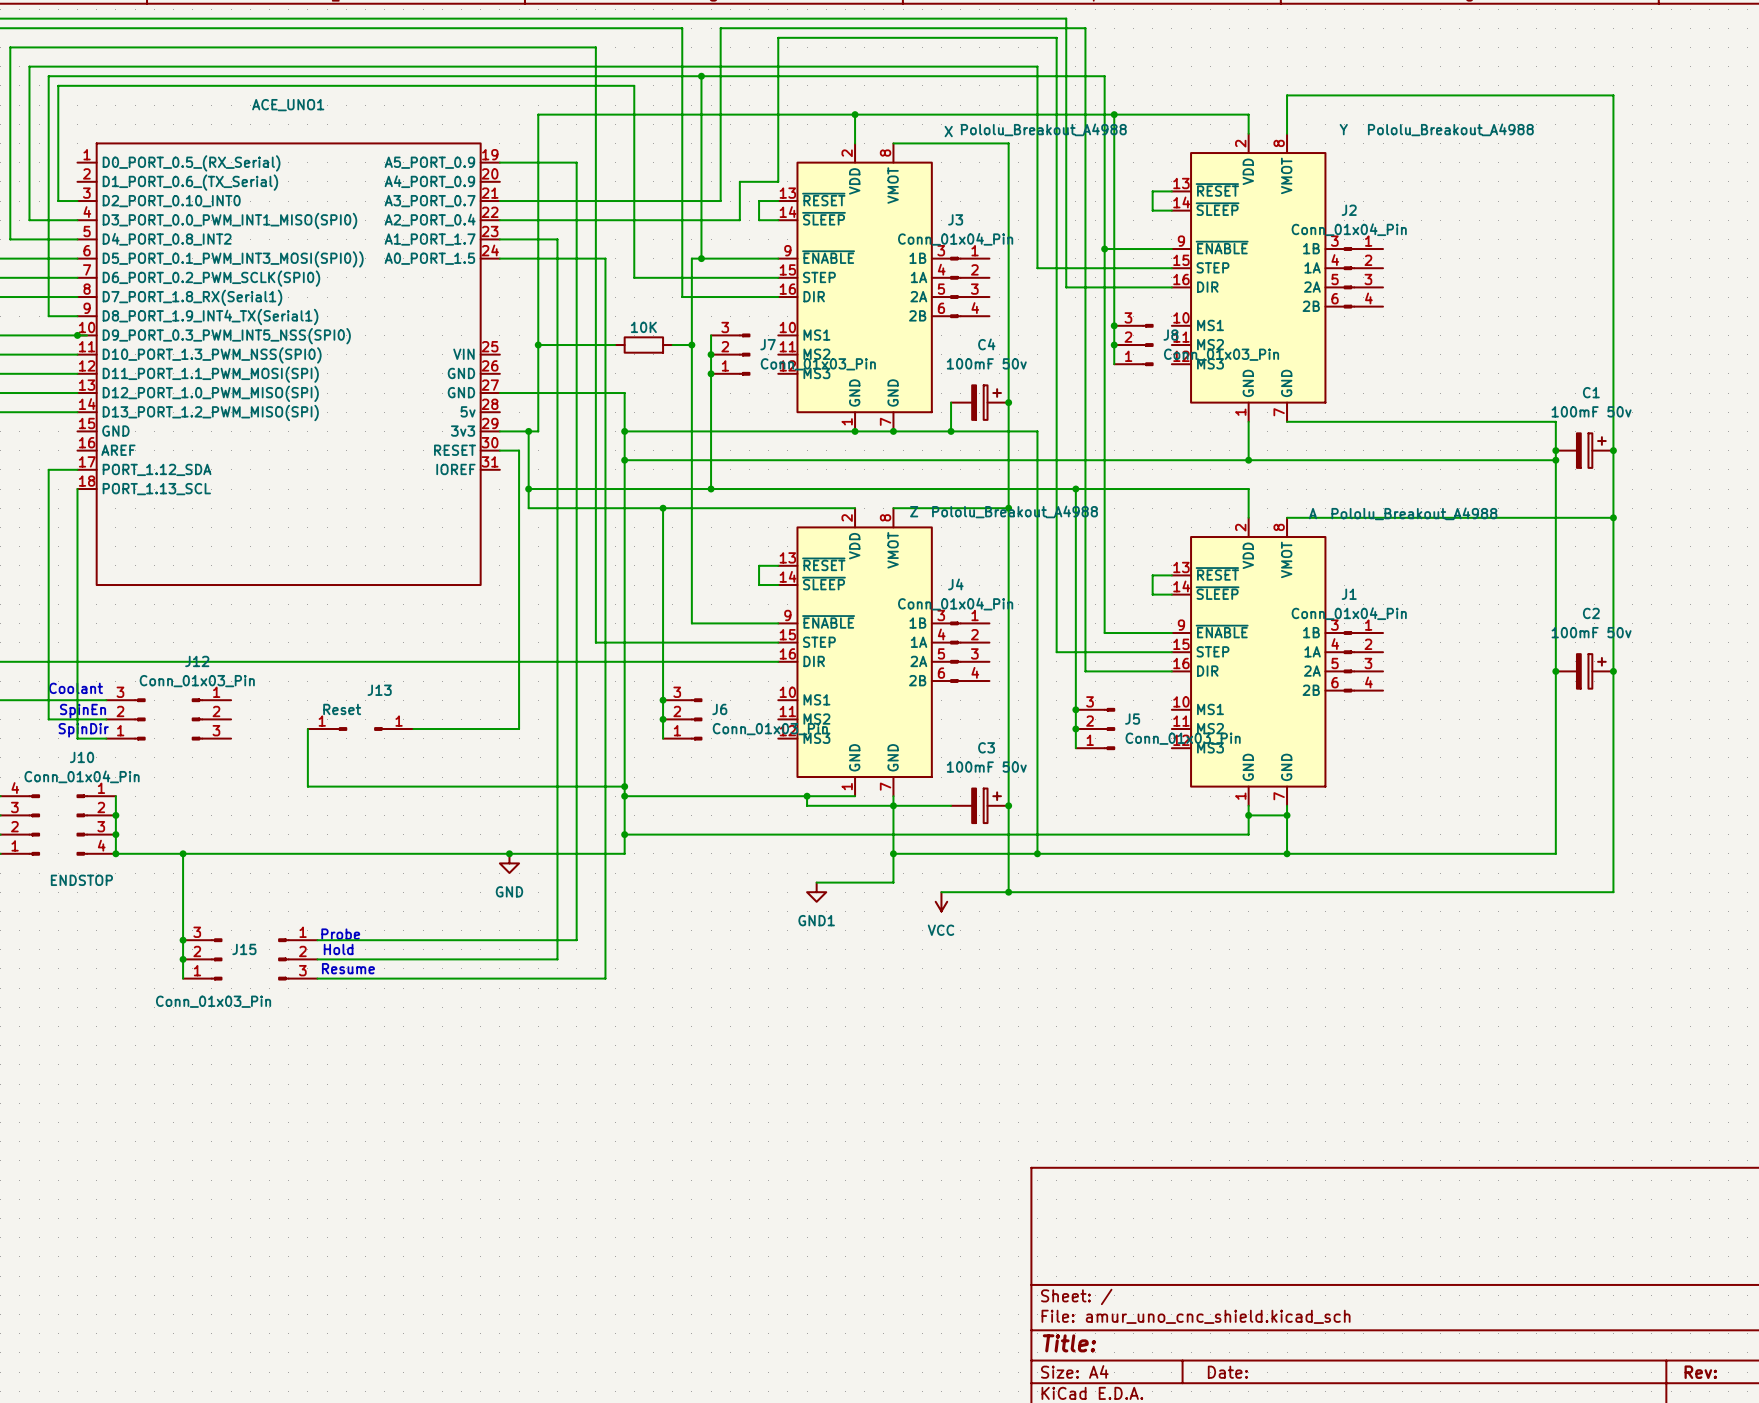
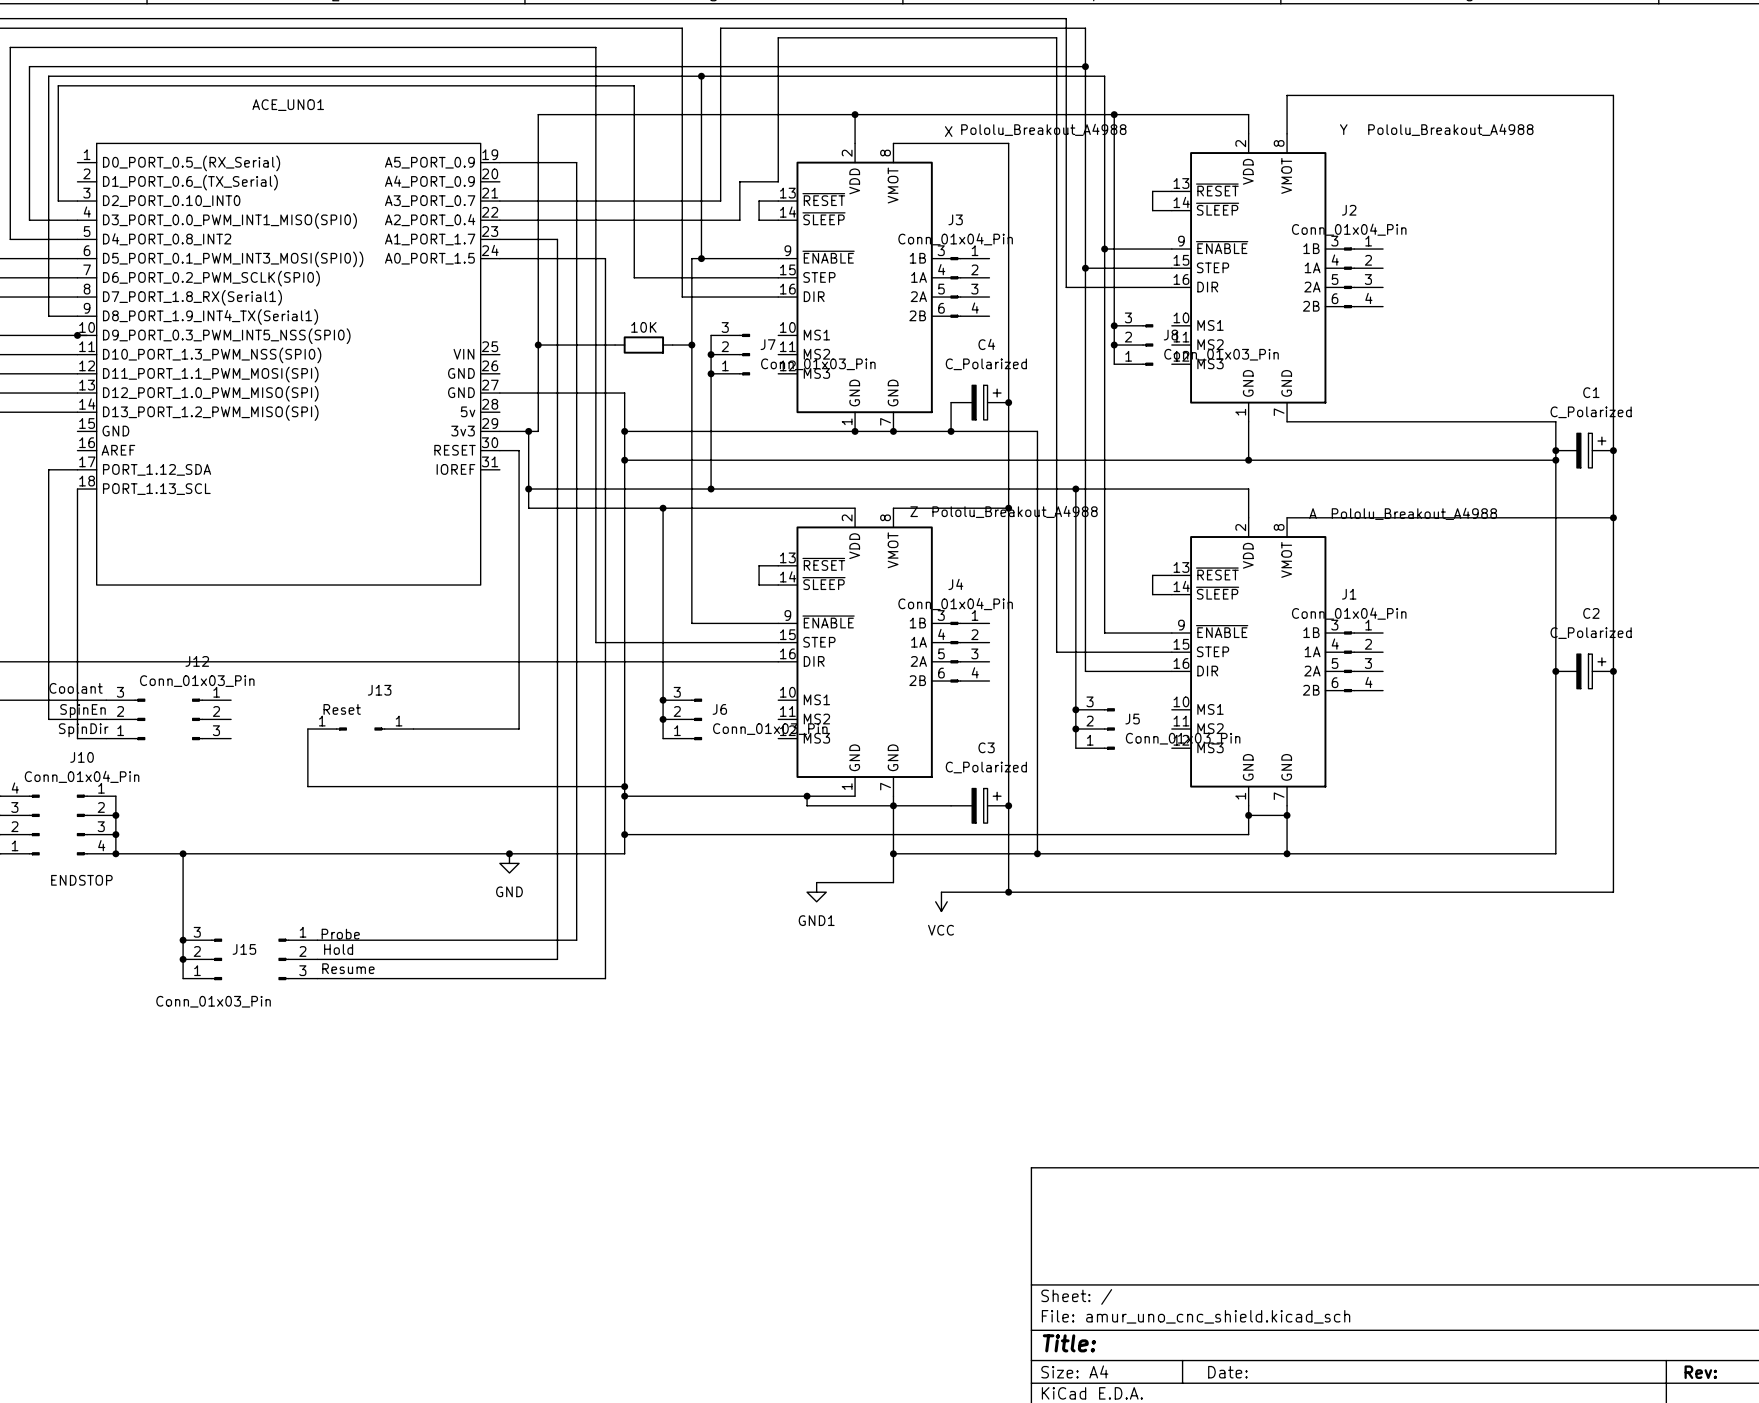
wire: (1037, 66) (1037, 268) (1085, 268) -> (1037, 66) (1085, 66)
junction: none -> (1085, 66)
junction: none -> (1085, 268)
C4 value: 100mF 50v (986, 363) -> C_Polarized (986, 364)
C1 value: 100mF 50v (1591, 411) -> C_Polarized (1591, 412)
C2 value: 100mF 50v (1591, 632) -> C_Polarized (1591, 633)
C3 value: 100mF 50v (986, 767) -> C_Polarized (986, 767)

